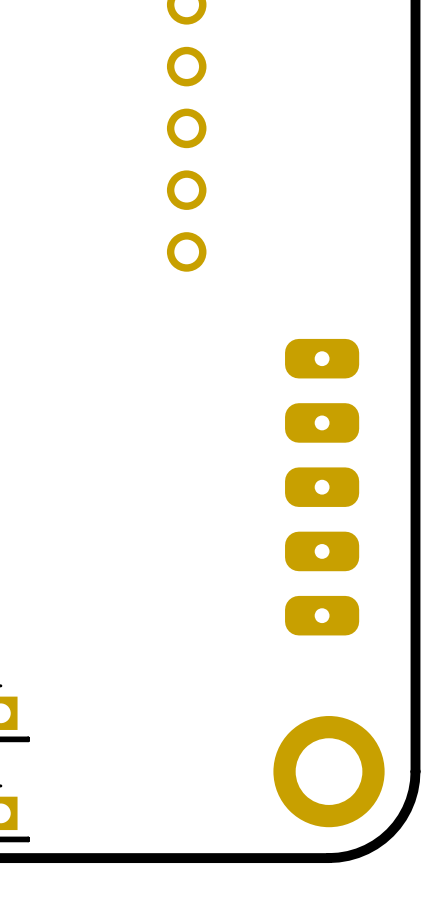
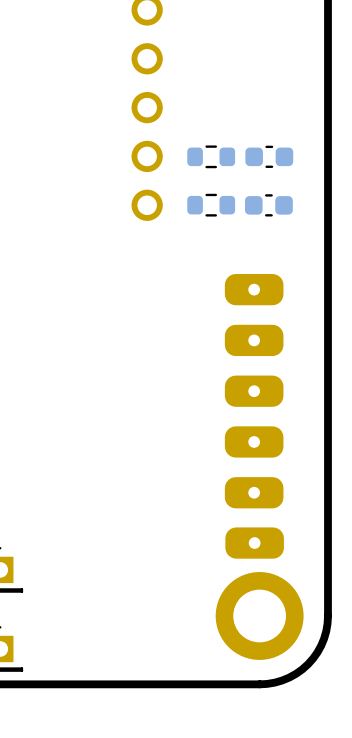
part: none -> (211, 156)
part: none -> (269, 156)
part: none -> (211, 205)
part: none -> (268, 205)
part: none -> (254, 543)

